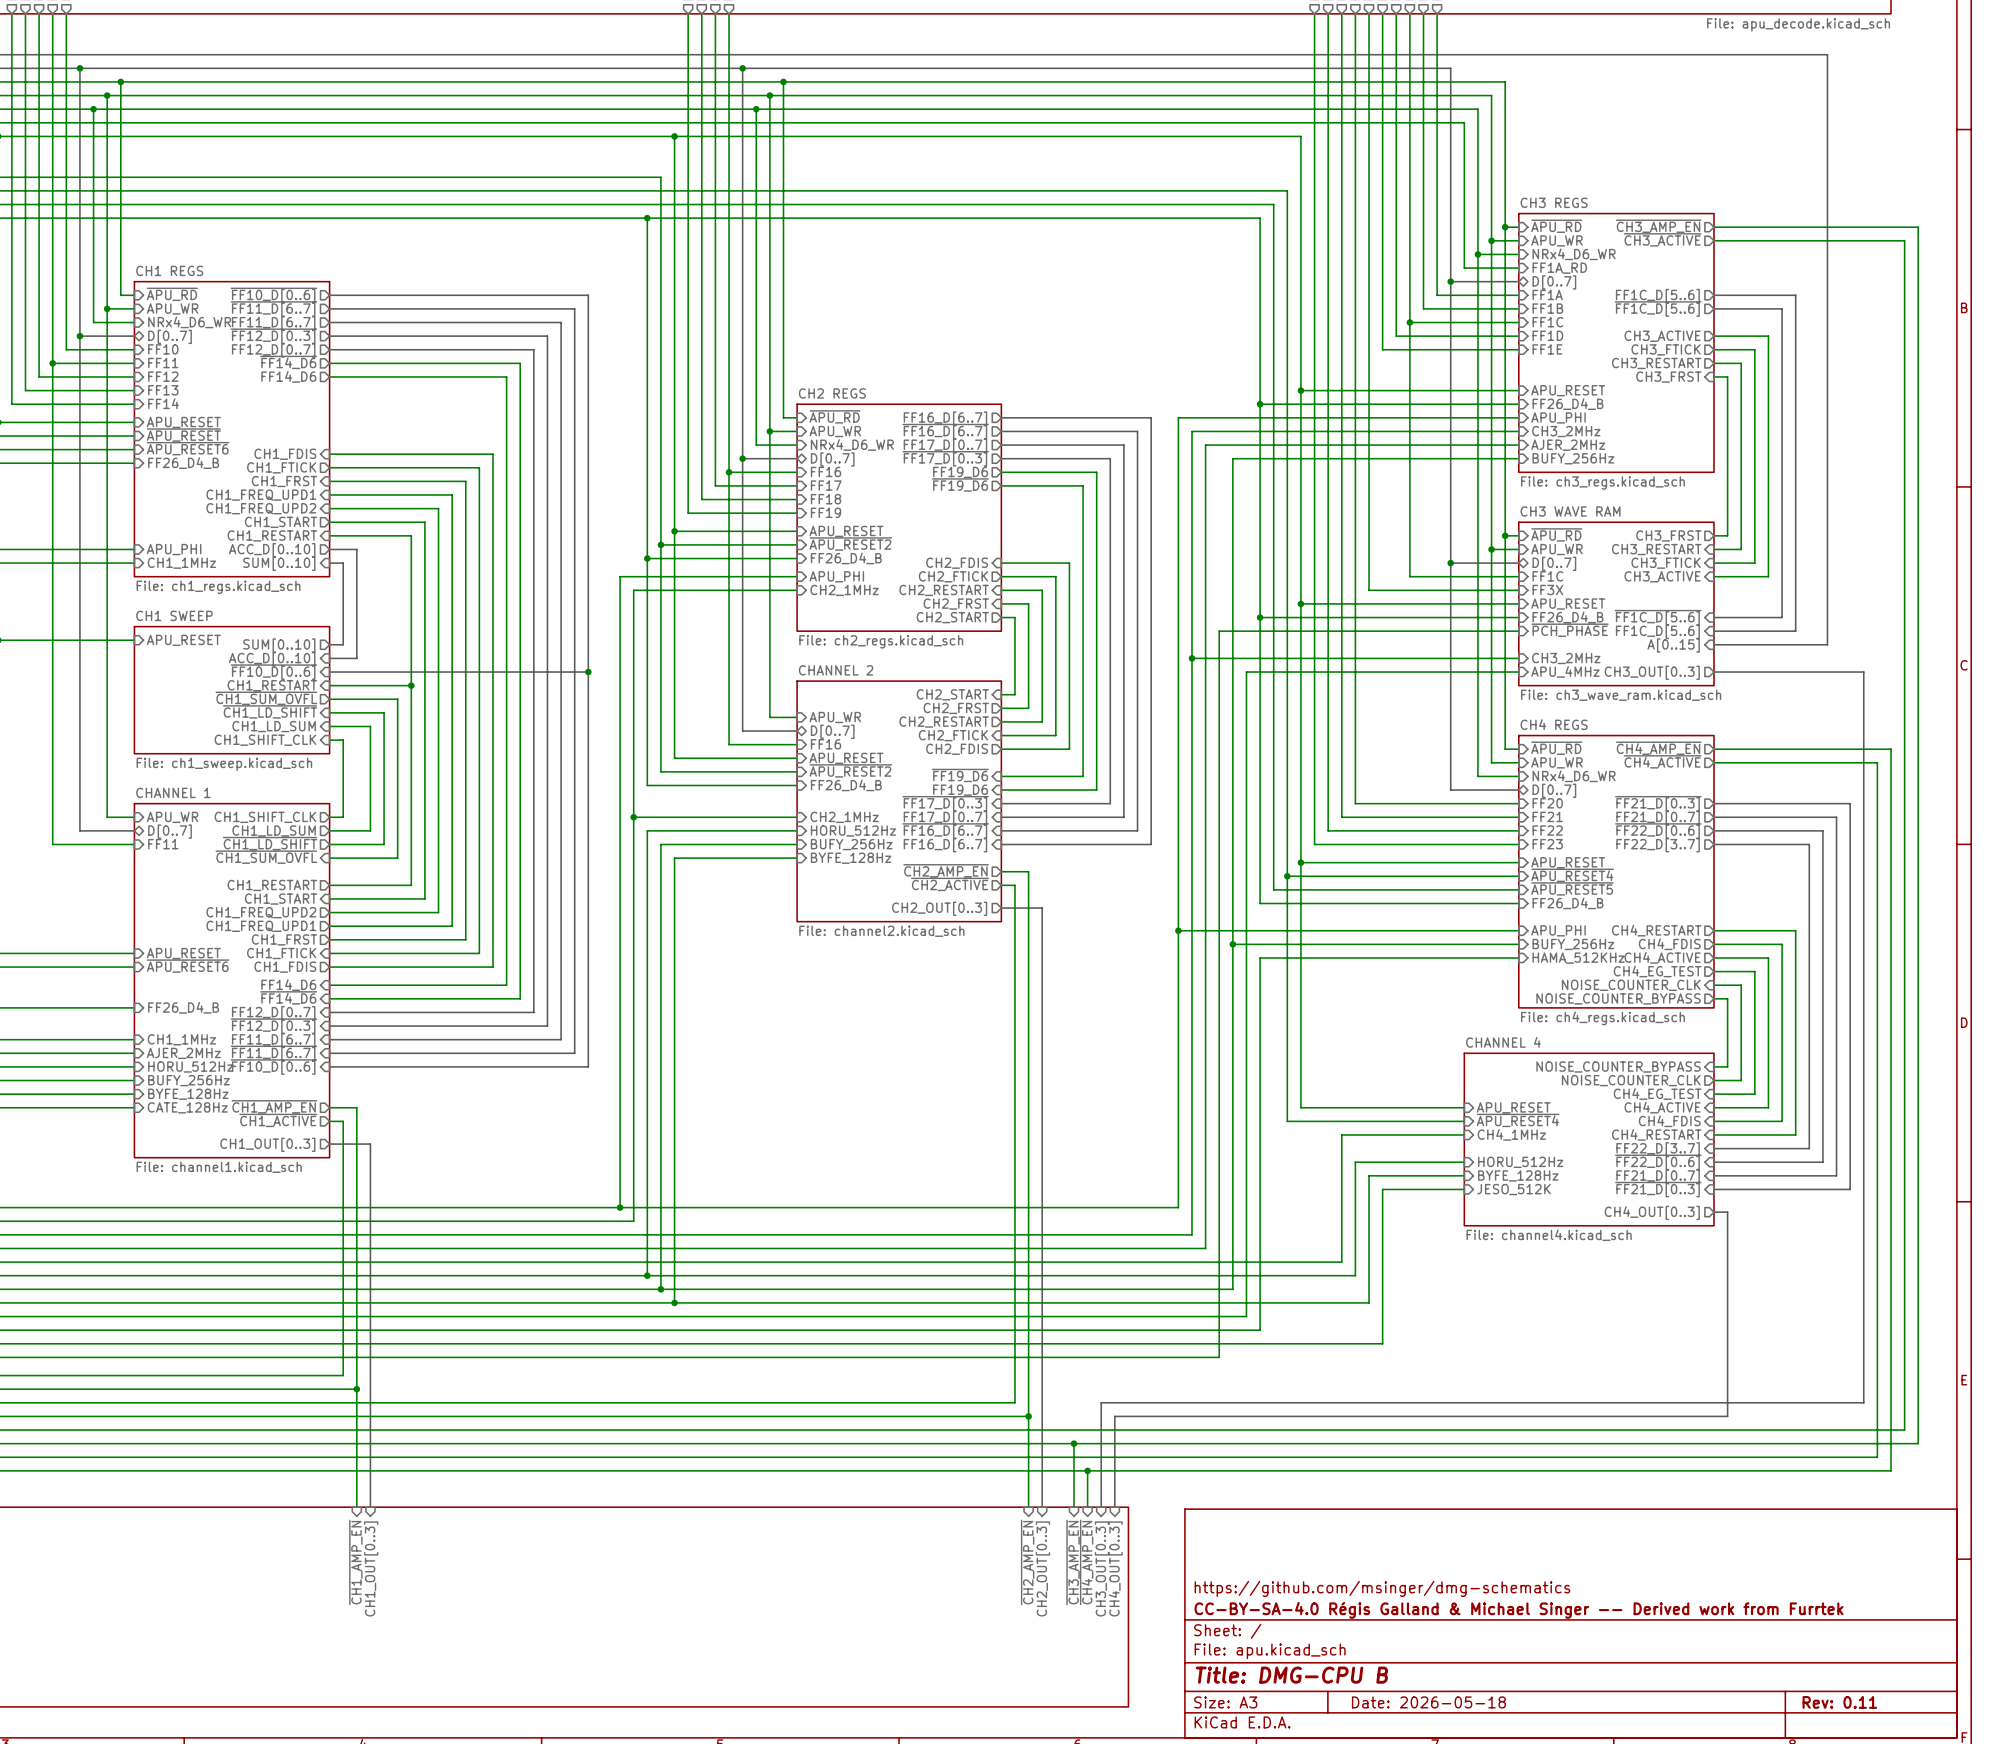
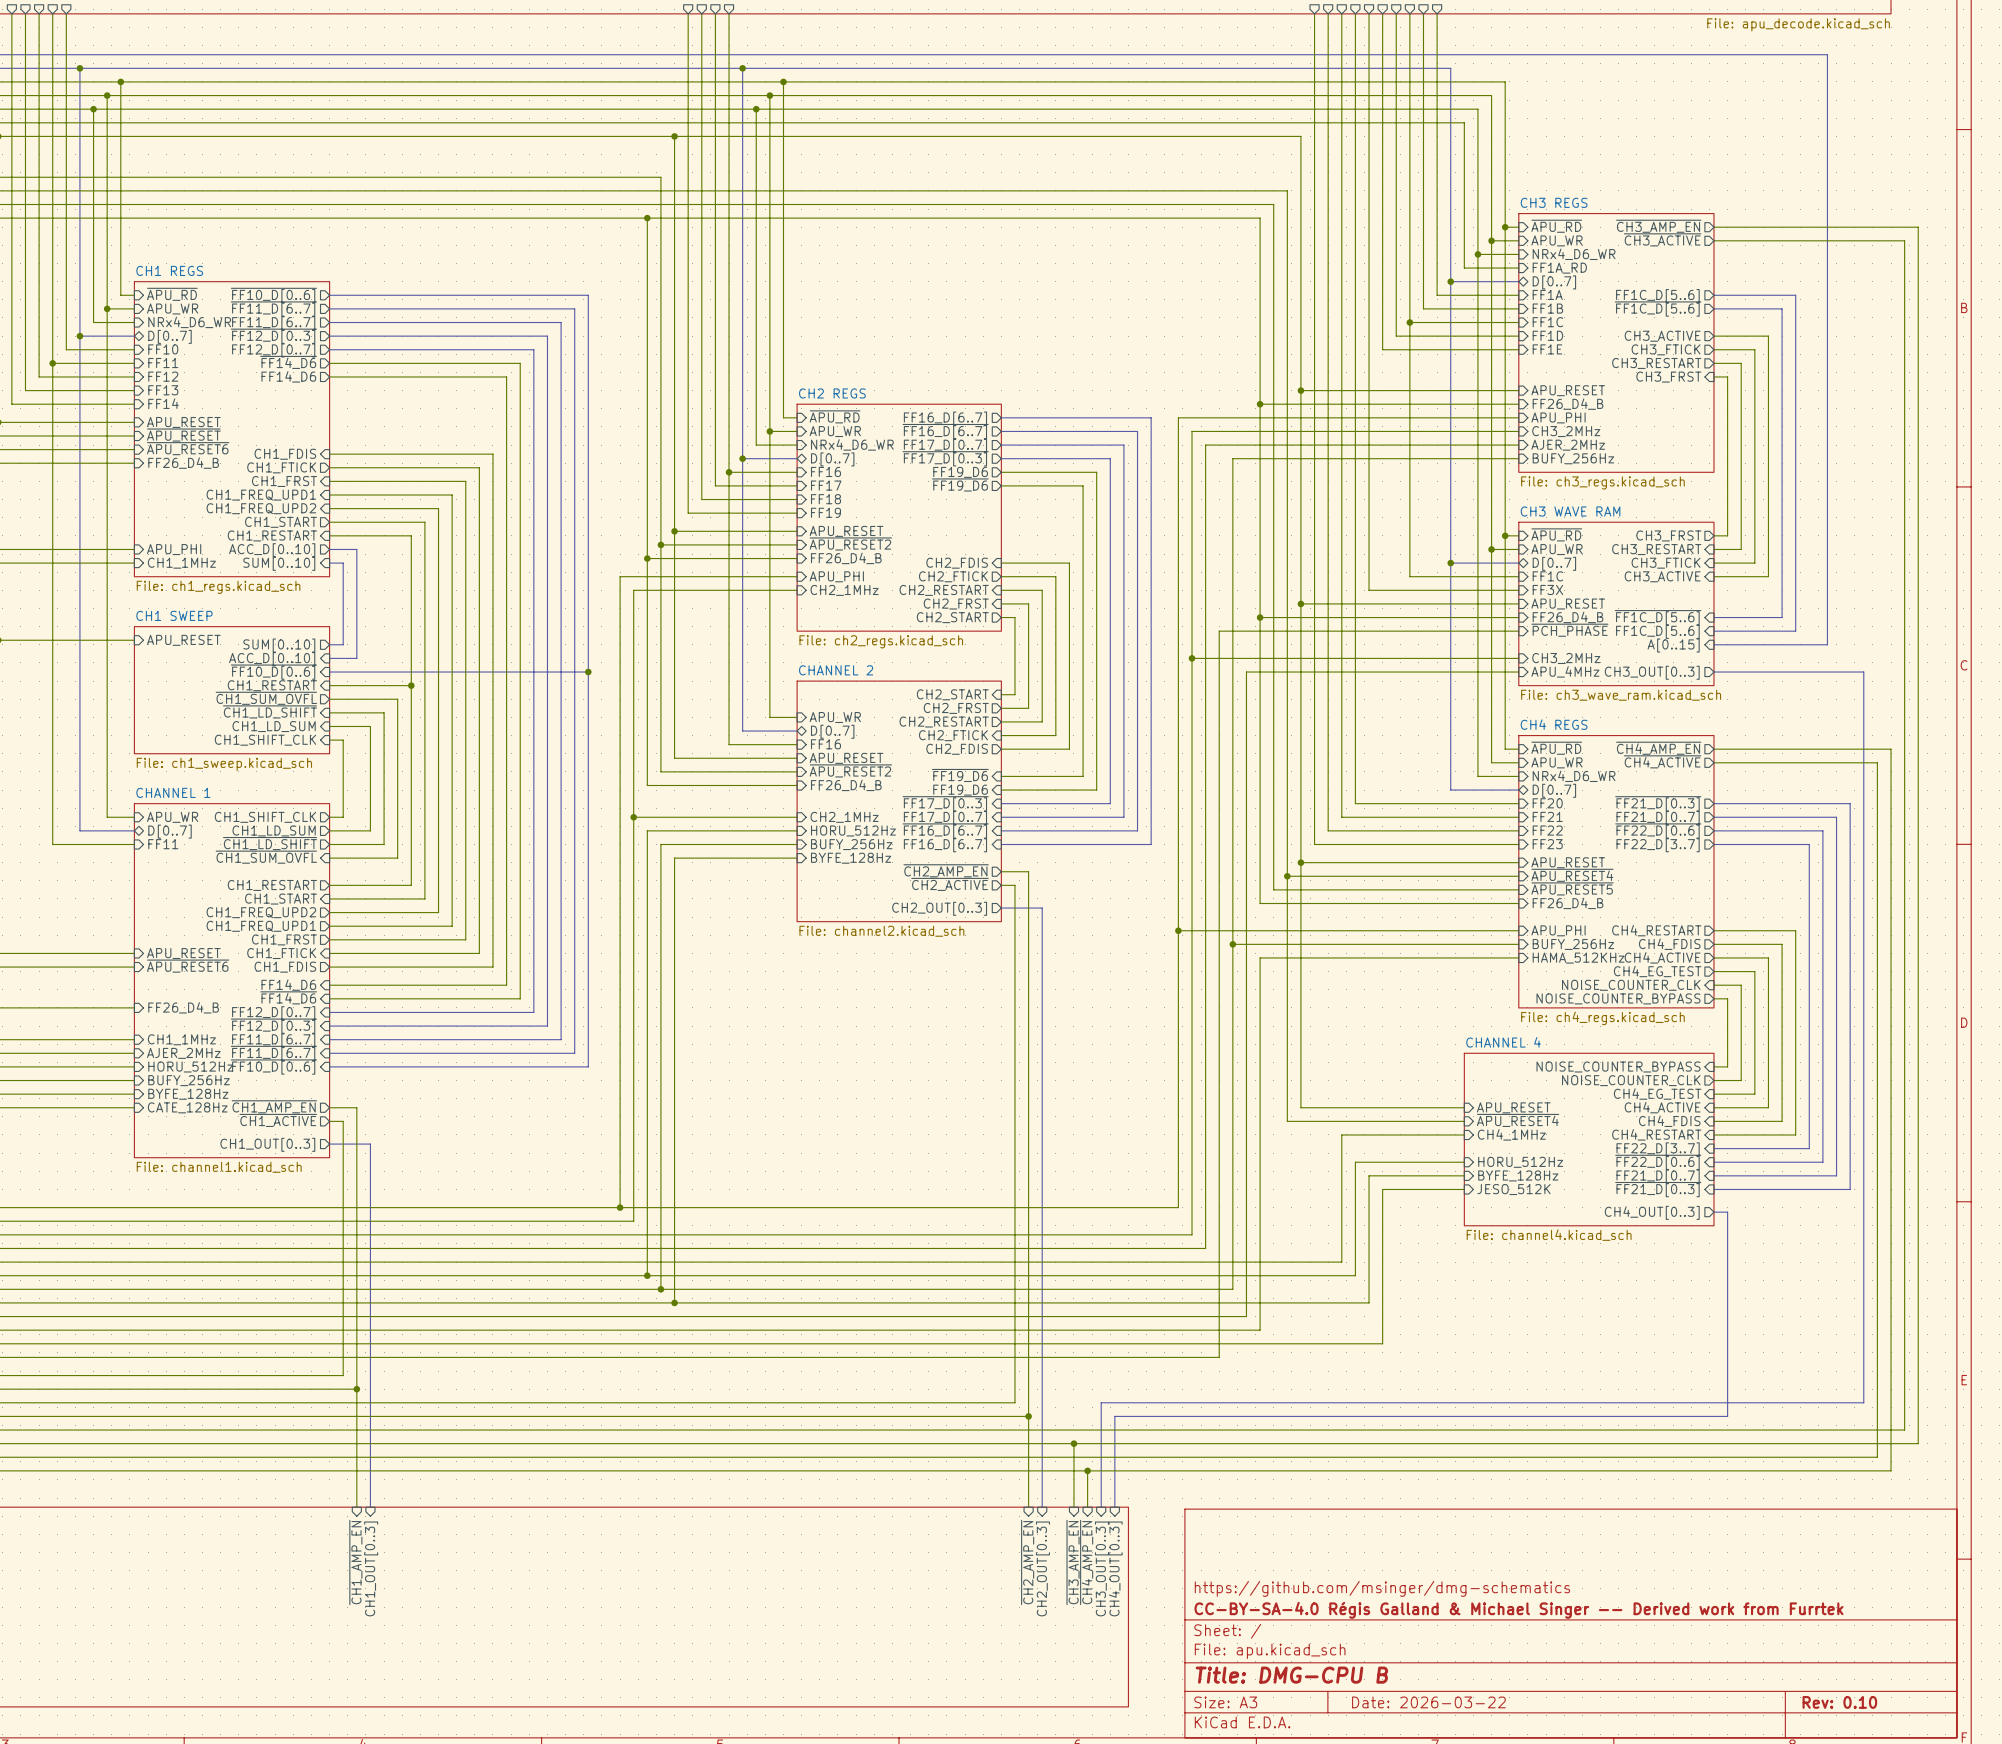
title block: Date: 2026-05-18 (1428, 1702) -> Date: 2026-03-22 (1428, 1702)
title block: Rev: 0.11 (1839, 1702) -> Rev: 0.10 (1839, 1702)

